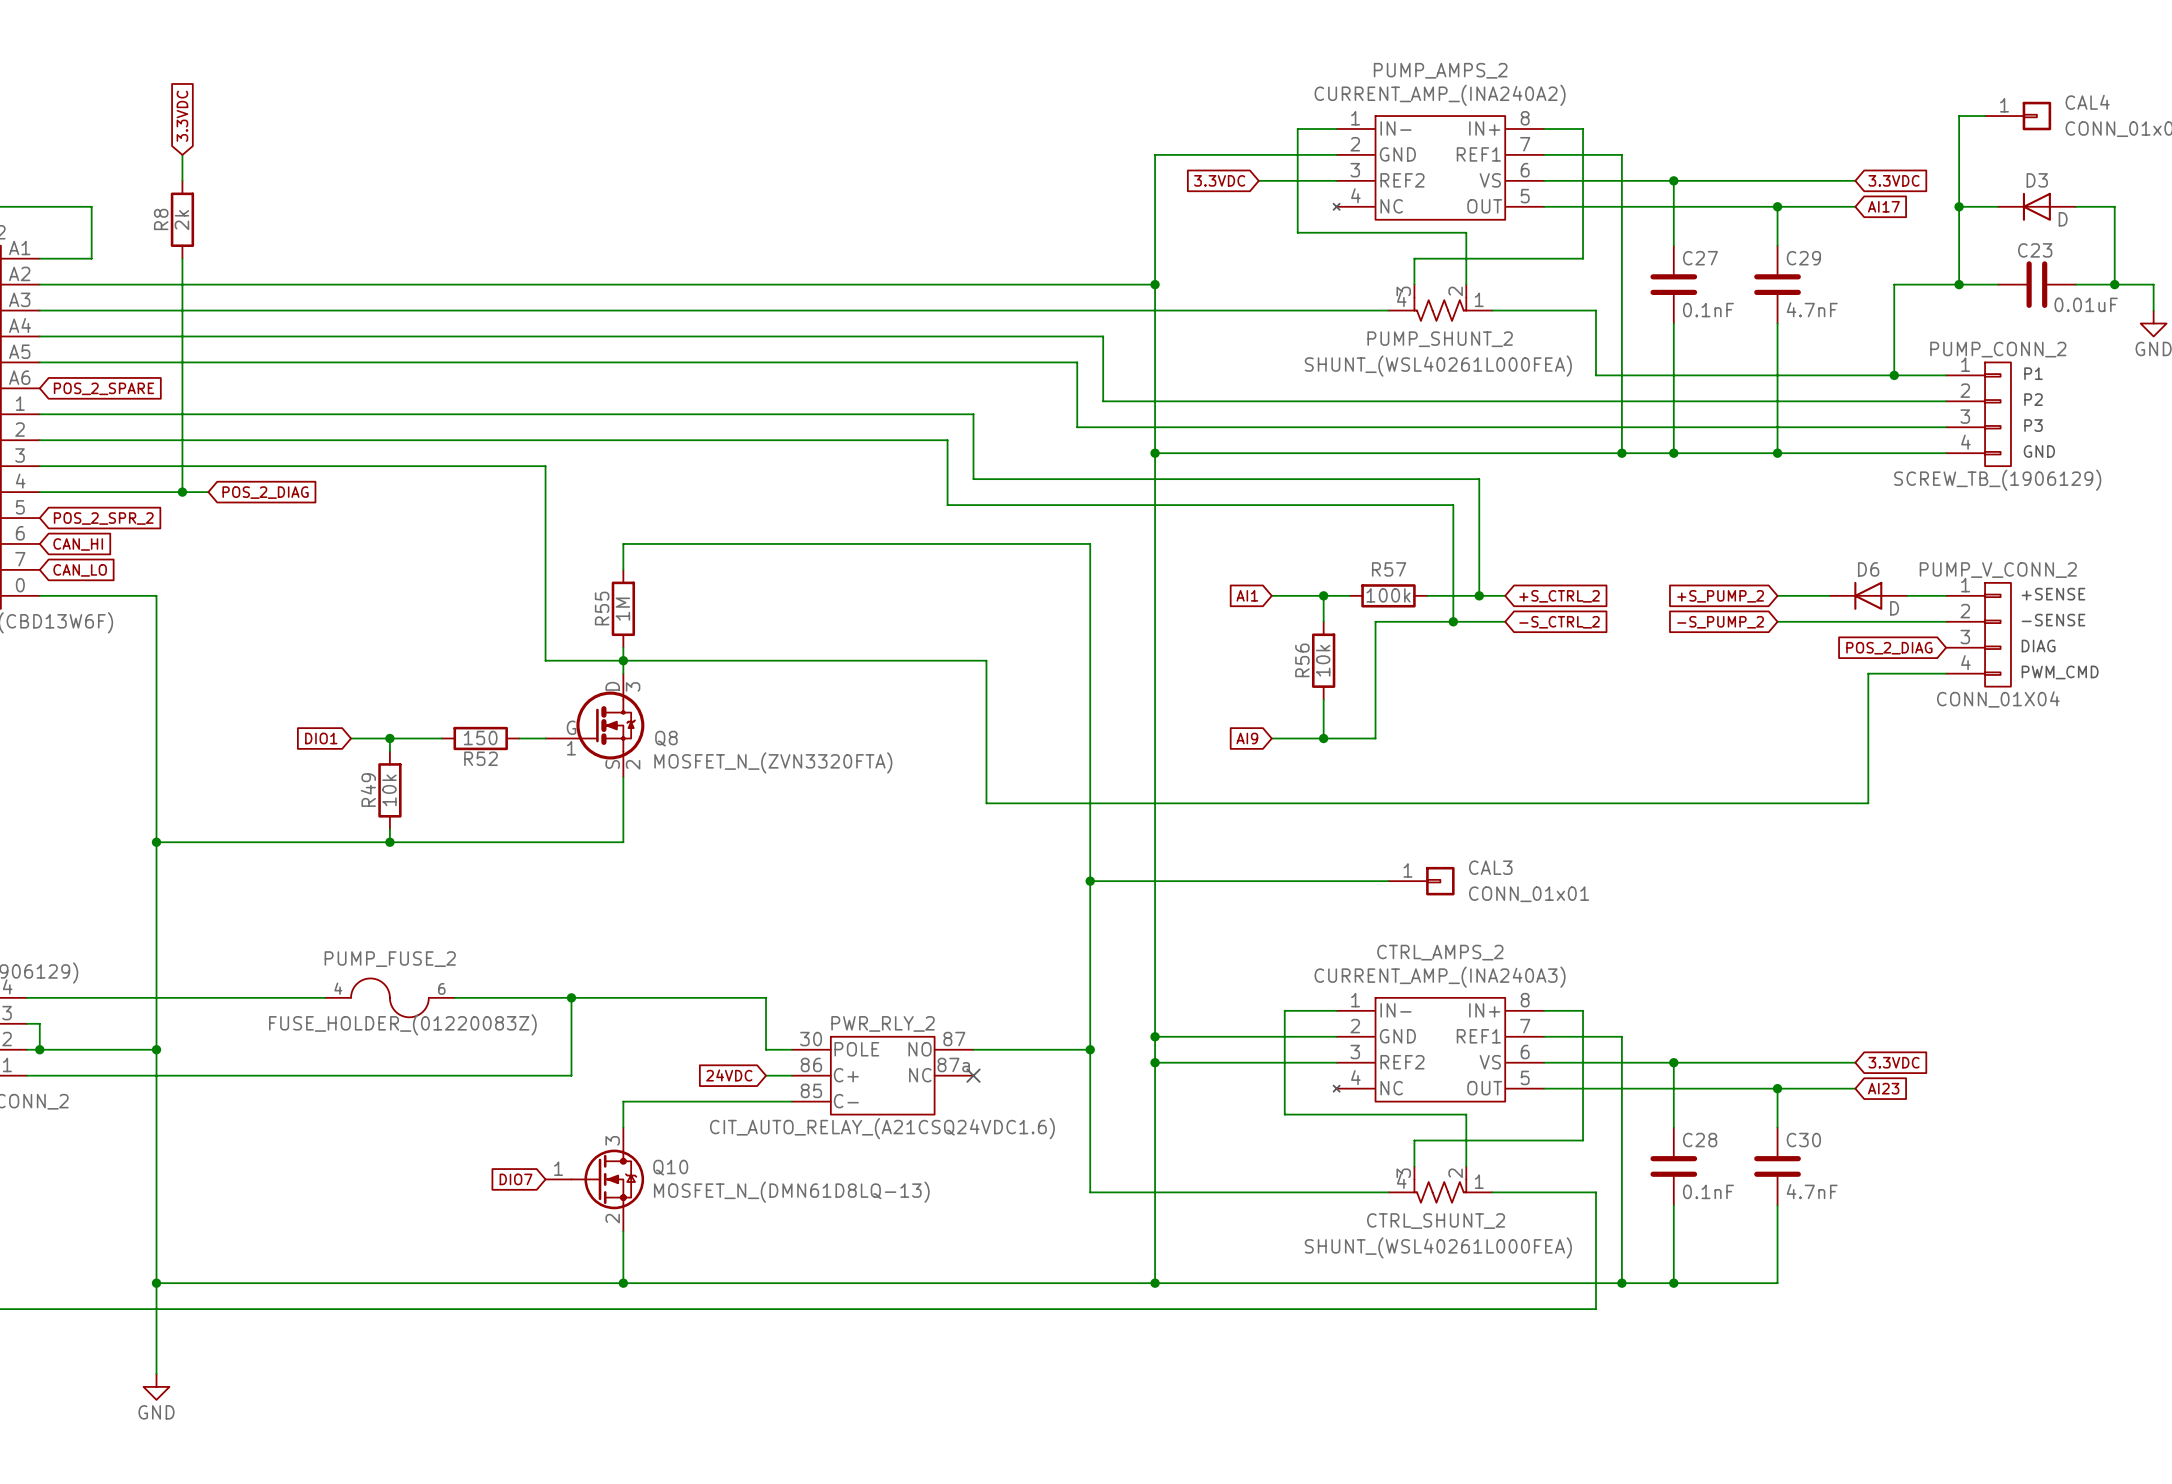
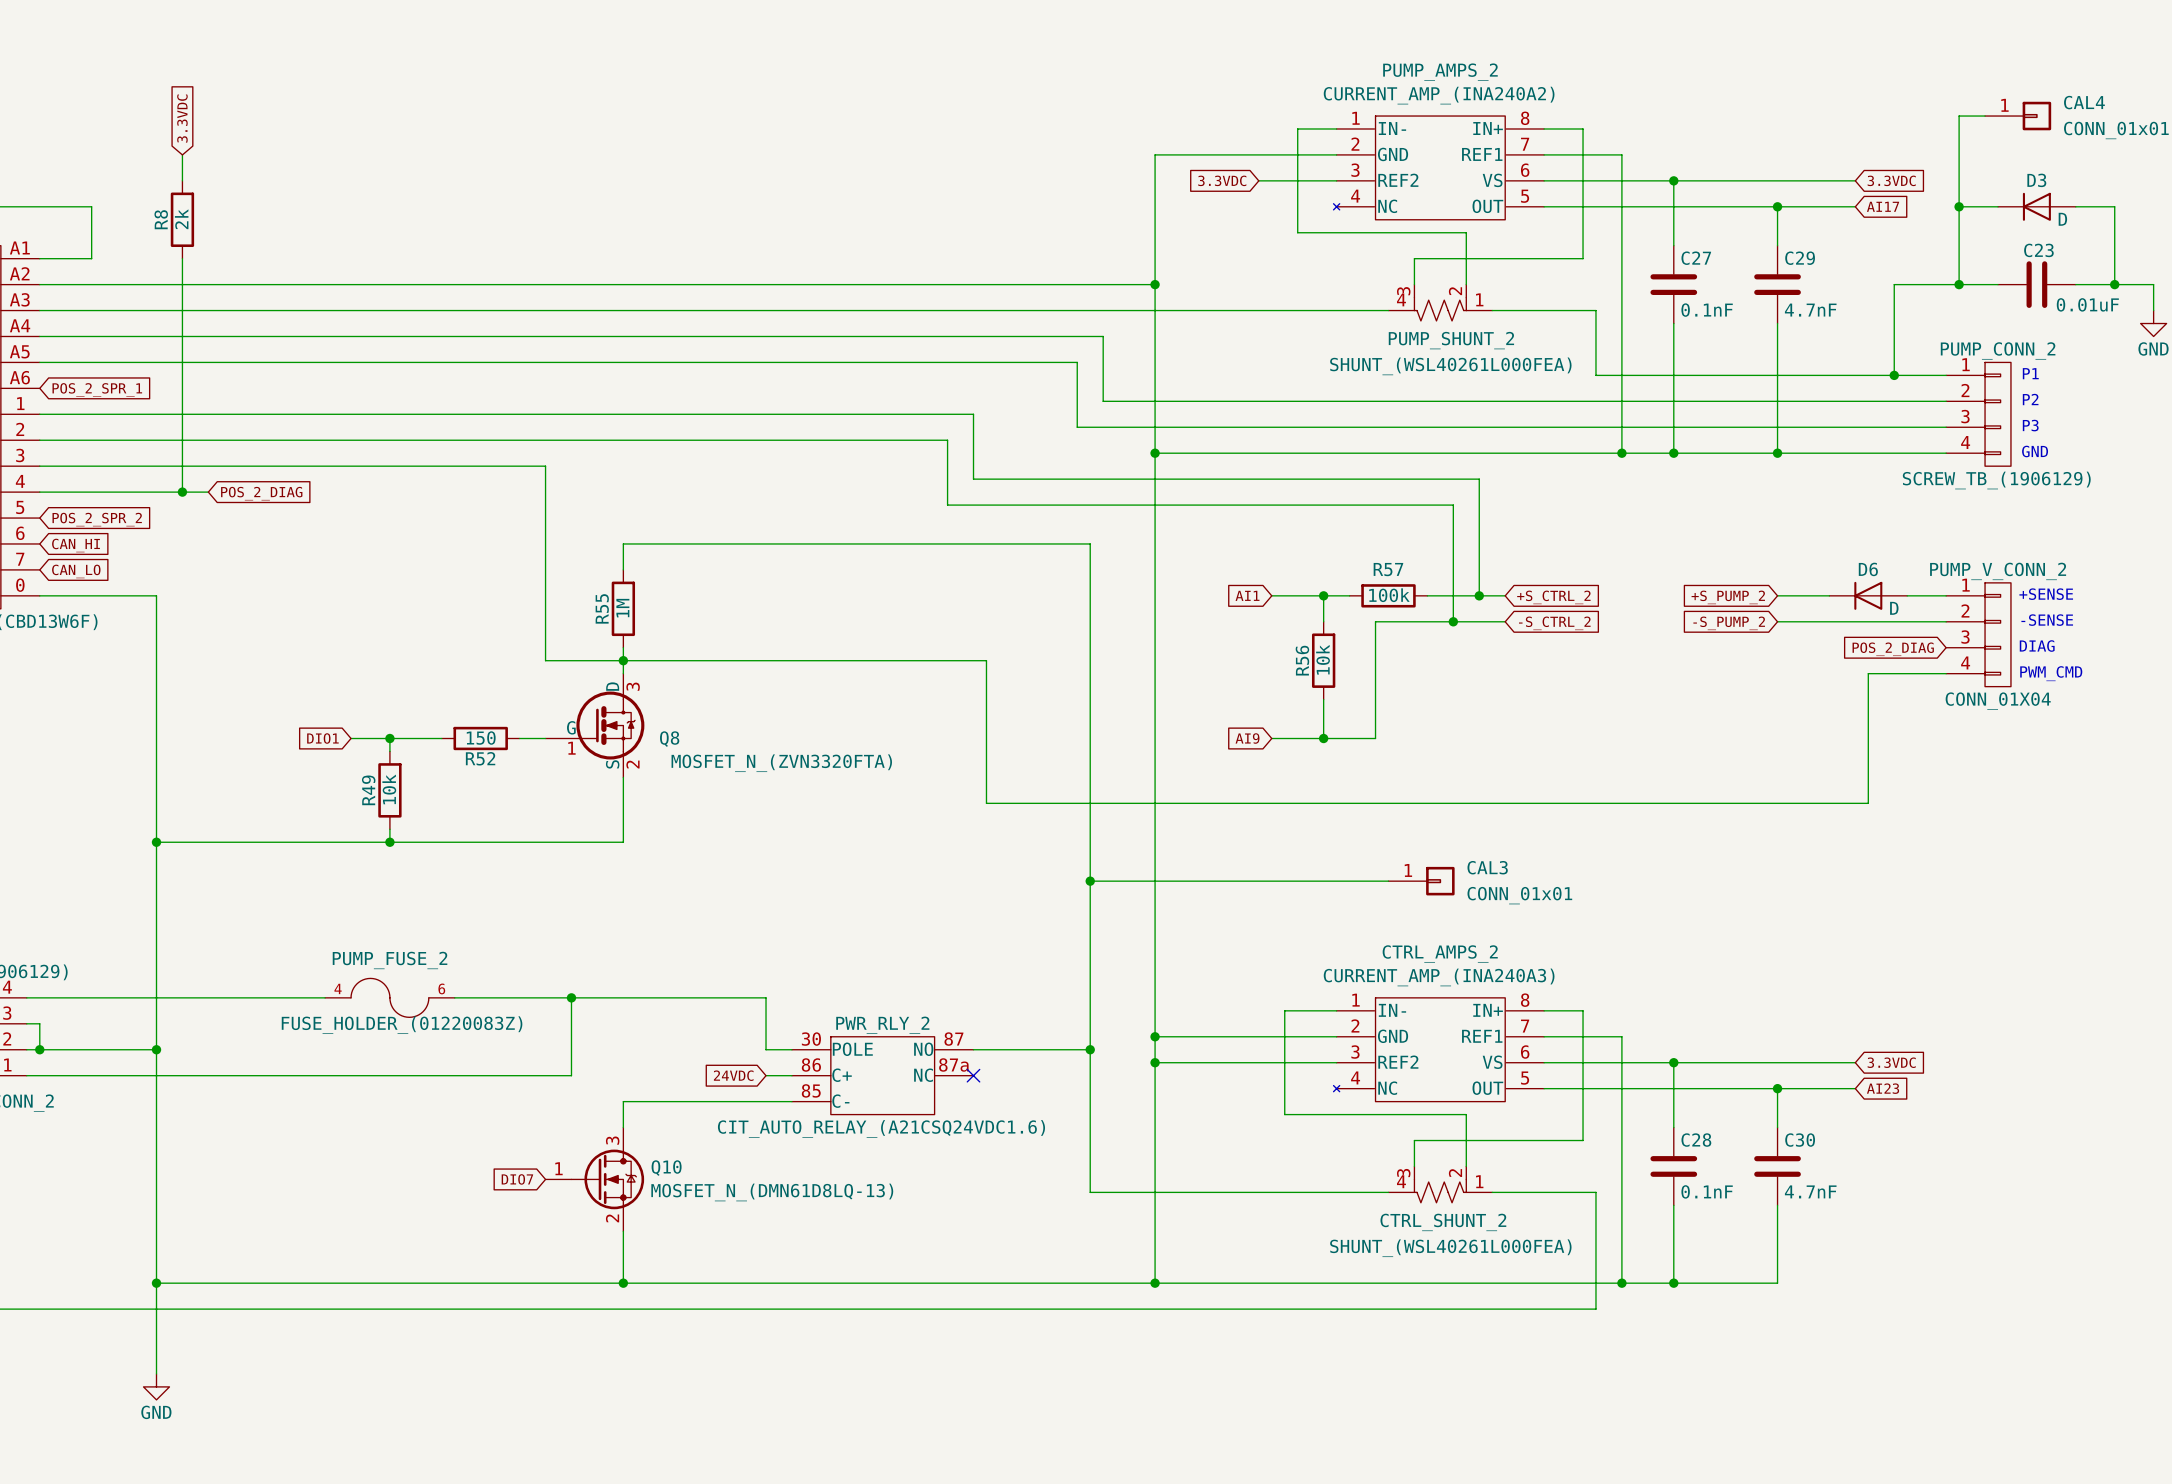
global label: POS_2_SPARE (103, 388) -> POS_2_SPR_1 (97, 389)

